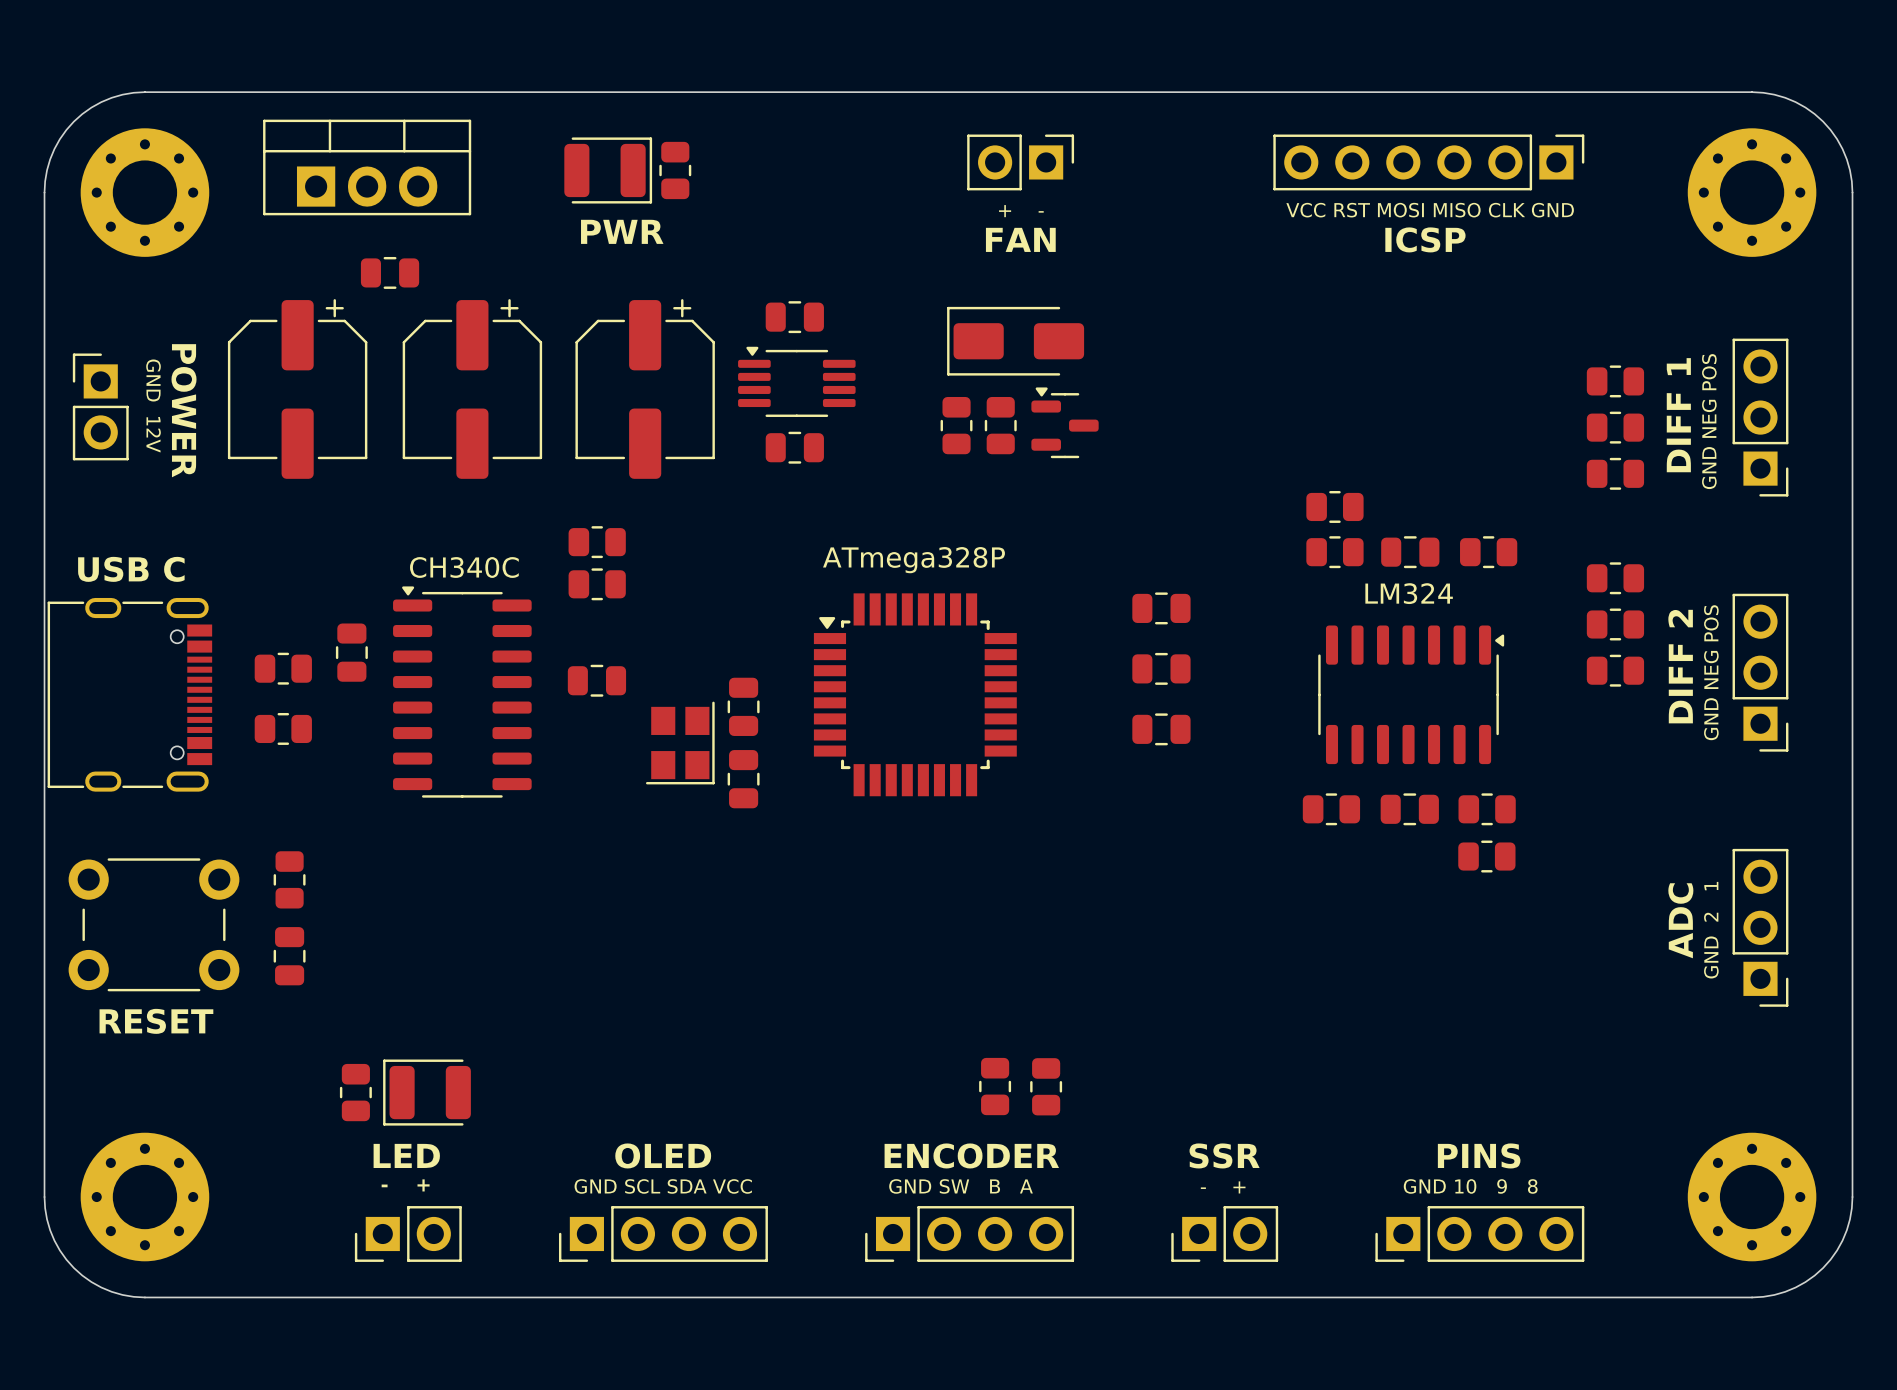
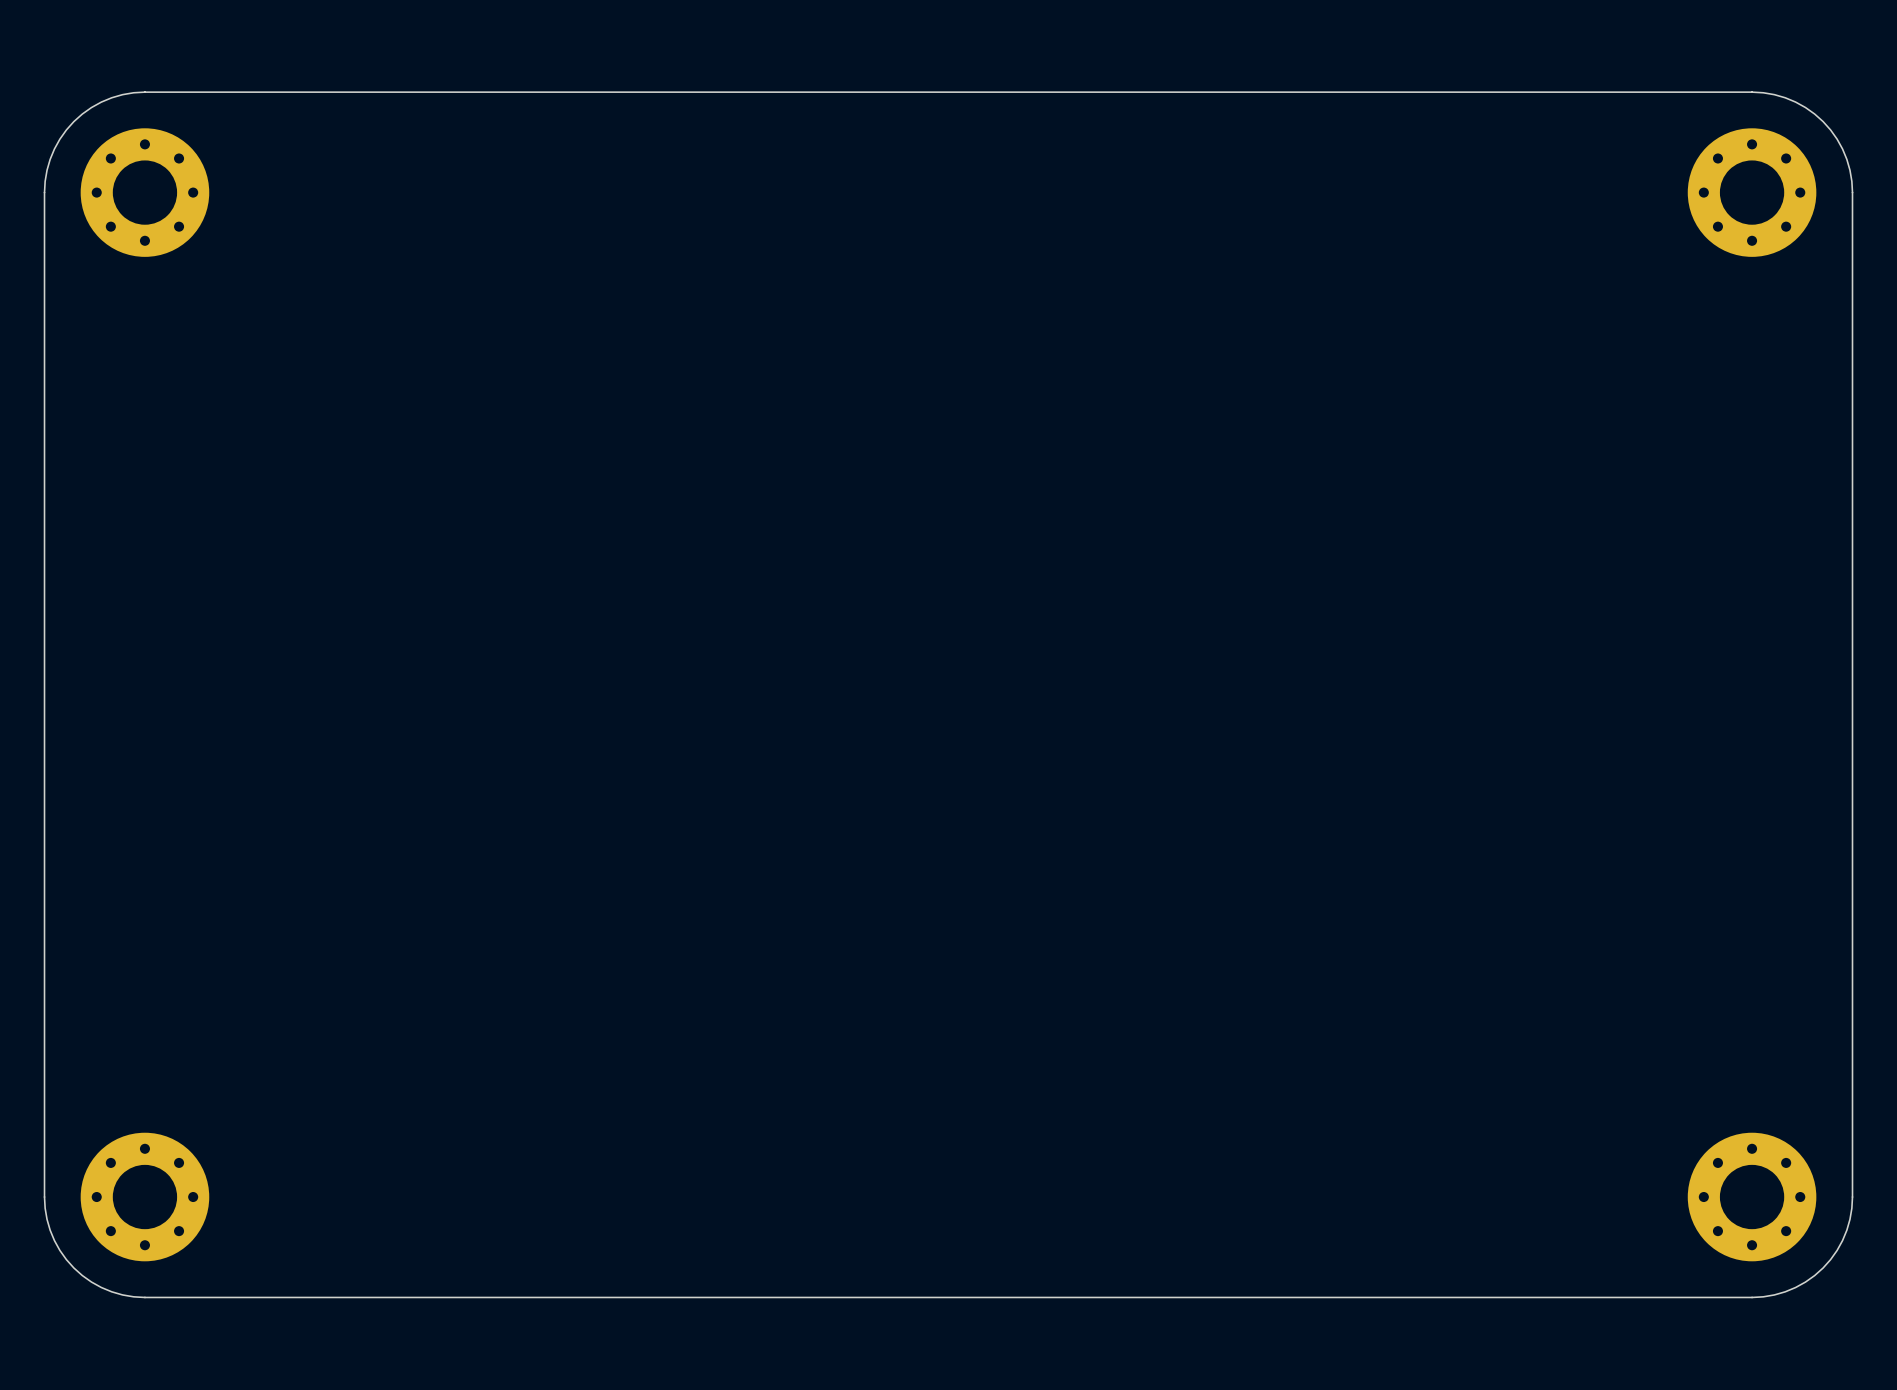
part: (1020, 162) -> none
part: (1428, 162) -> none
part: (367, 167) -> none
part: (608, 170) -> none
part: (675, 170) -> none
text: VCC RST MOSI MISO CLK GND (1430, 210) -> none
text: + - (1021, 211) -> none
text: PWR (622, 231) -> none
text: FAN (1020, 239) -> none
text: ICSP (1425, 239) -> none
part: (390, 272) -> none
part: (794, 317) -> none
part: (1015, 341) -> none
part: (796, 381) -> none
part: (1615, 381) -> none
part: (297, 388) -> none
part: (472, 388) -> none
part: (645, 388) -> none
text: GND 12V (153, 405) -> none
part: (100, 406) -> none
text: POWER (184, 410) -> none
text: DIFF 1 (1678, 415) -> none
part: (1760, 417) -> none
text: GND NEG POS (1709, 421) -> none
part: (1065, 422) -> none
part: (956, 425) -> none
part: (1000, 425) -> none
part: (1615, 427) -> none
part: (794, 447) -> none
part: (1615, 473) -> none
part: (1334, 506) -> none
part: (597, 542) -> none
part: (1334, 552) -> none
part: (1410, 552) -> none
part: (1488, 552) -> none
text: ATmega328P (913, 560) -> none
text: CH340C (464, 567) -> none
text: USB C (131, 569) -> none
part: (1615, 578) -> none
part: (597, 584) -> none
text: LM324 (1409, 593) -> none
part: (1161, 608) -> none
part: (1615, 624) -> none
part: (351, 652) -> none
text: DIFF 2 (1680, 666) -> none
part: (283, 668) -> none
part: (1161, 668) -> none
part: (1615, 670) -> none
text: GND NEG POS (1711, 672) -> none
part: (1760, 672) -> none
part: (596, 680) -> none
part: (462, 692) -> none
part: (129, 694) -> none
part: (915, 694) -> none
part: (1411, 694) -> none
part: (743, 706) -> none
part: (283, 728) -> none
part: (1161, 729) -> none
part: (680, 743) -> none
part: (743, 779) -> none
part: (1331, 809) -> none
part: (1409, 809) -> none
part: (1487, 809) -> none
part: (1486, 856) -> none
part: (289, 879) -> none
text: ADC (1680, 920) -> none
part: (153, 924) -> none
part: (1760, 927) -> none
text: GND 2 1 (1711, 930) -> none
part: (289, 956) -> none
text: RESET (156, 1021) -> none
part: (995, 1086) -> none
part: (1046, 1086) -> none
part: (355, 1092) -> none
part: (427, 1092) -> none
text: LED (406, 1155) -> none
text: OLED (663, 1155) -> none
text: ENCODER (971, 1155) -> none
text: SSR (1224, 1155) -> none
text: PINS (1479, 1155) -> none
text: - + (405, 1185) -> none
text: GND SCL SDA VCC (663, 1186) -> none
text: GND SW B A (961, 1186) -> none
text: GND 10 9 8 (1470, 1186) -> none
text: - + (1223, 1187) -> none
part: (408, 1233) -> none
part: (663, 1233) -> none
part: (969, 1233) -> none
part: (1224, 1233) -> none
part: (1479, 1233) -> none

